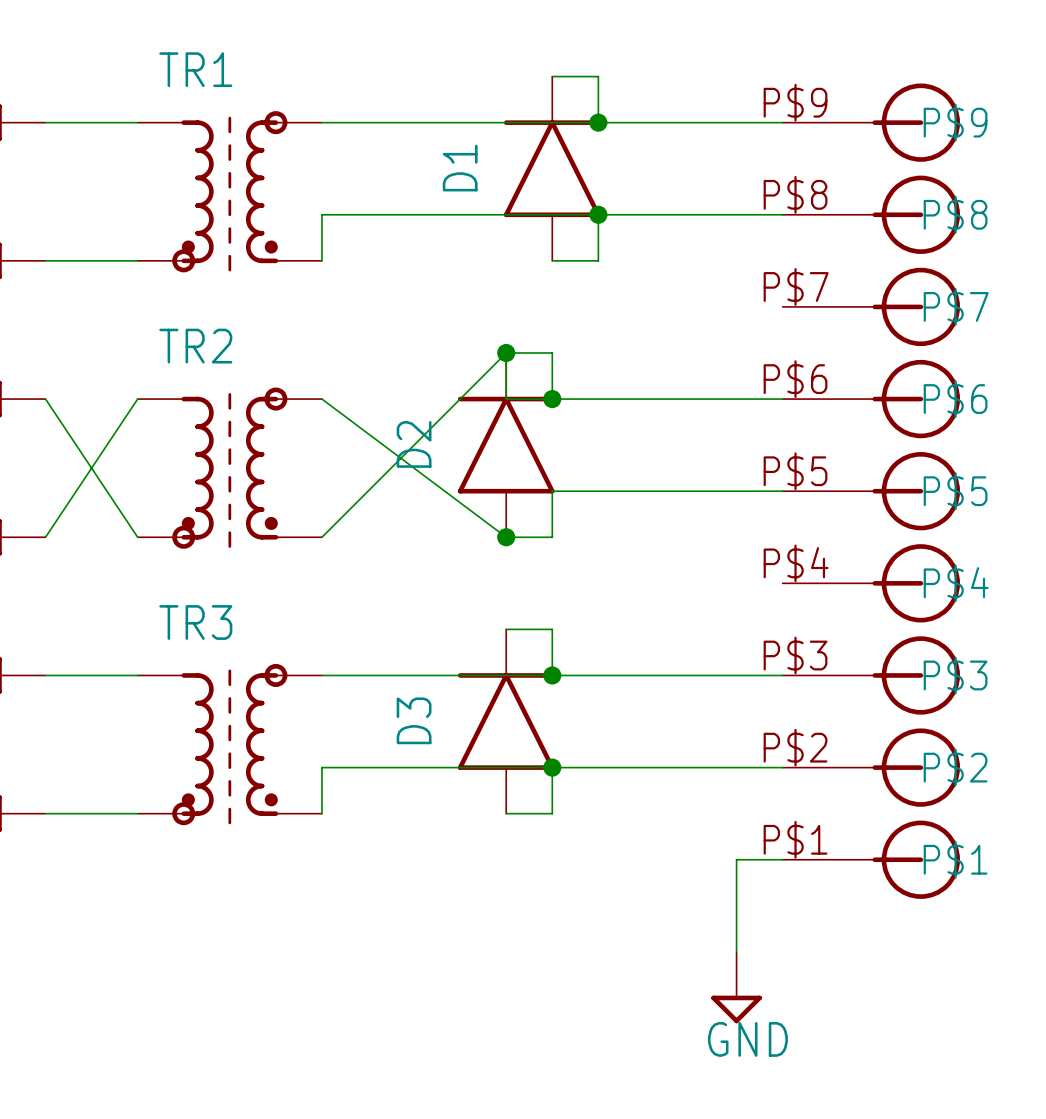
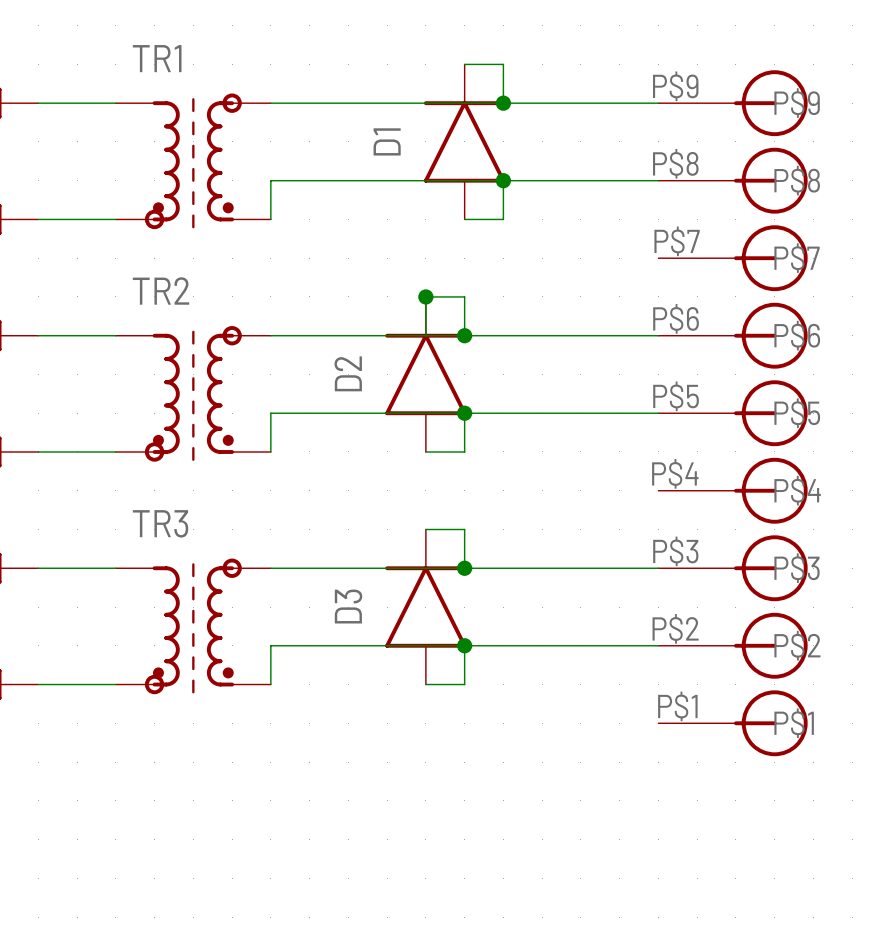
wire: (506, 352) (321, 537) -> (464, 413) (270, 413) (270, 451)
wire: (45, 399) (137, 537) -> (38, 335) (115, 335)
wire: (137, 399) (45, 537) -> (115, 451) (38, 451)
wire: (321, 399) (506, 537) -> (270, 335) (425, 335)
junction position: (506, 537) -> (464, 413)
wire: (782, 859) (736, 859) (736, 951) -> none
power symbol: GND (736, 987) -> none

